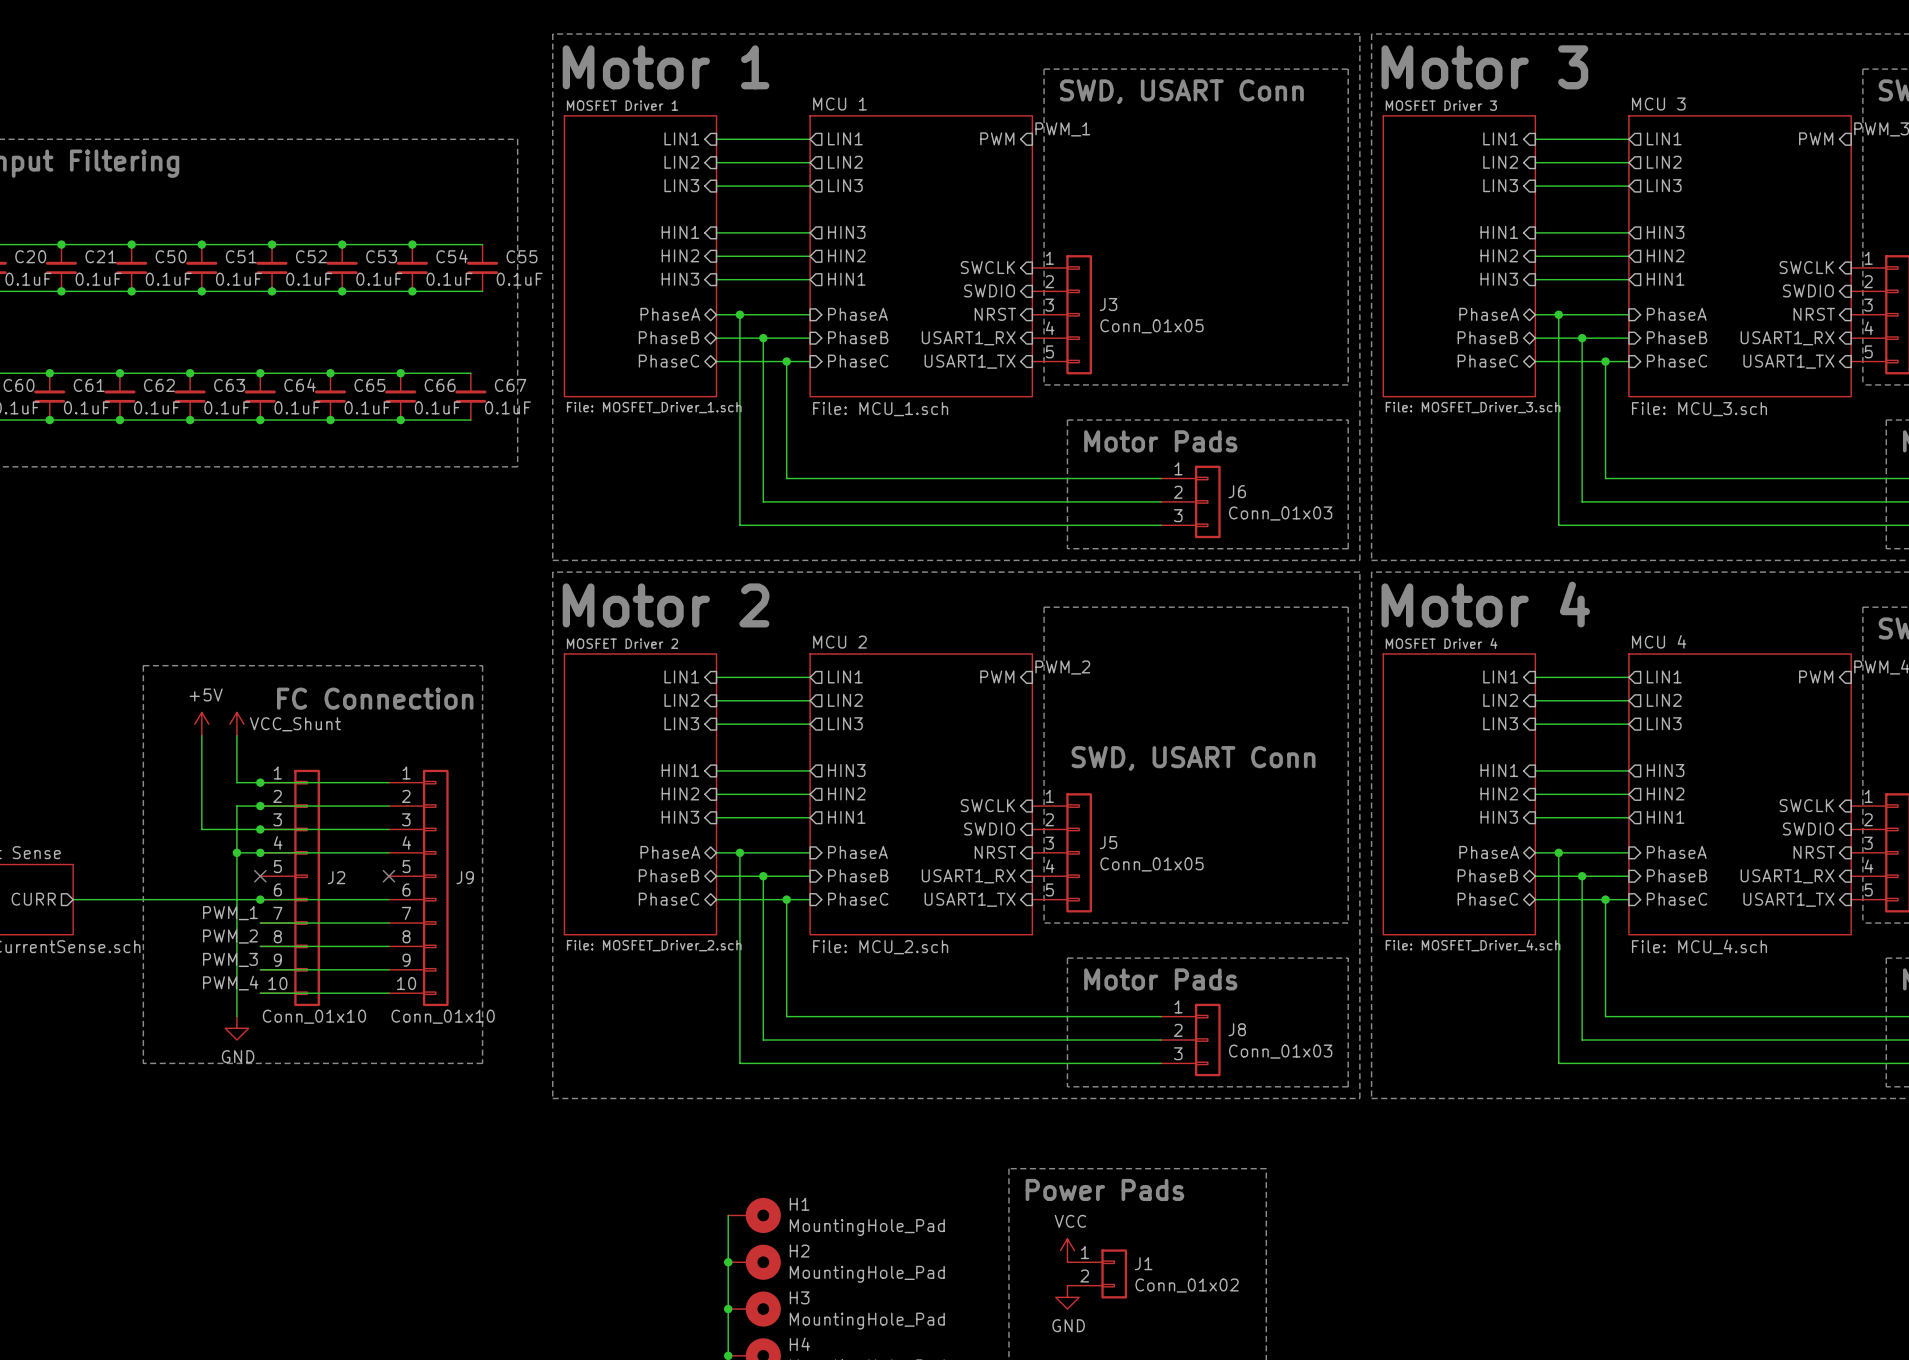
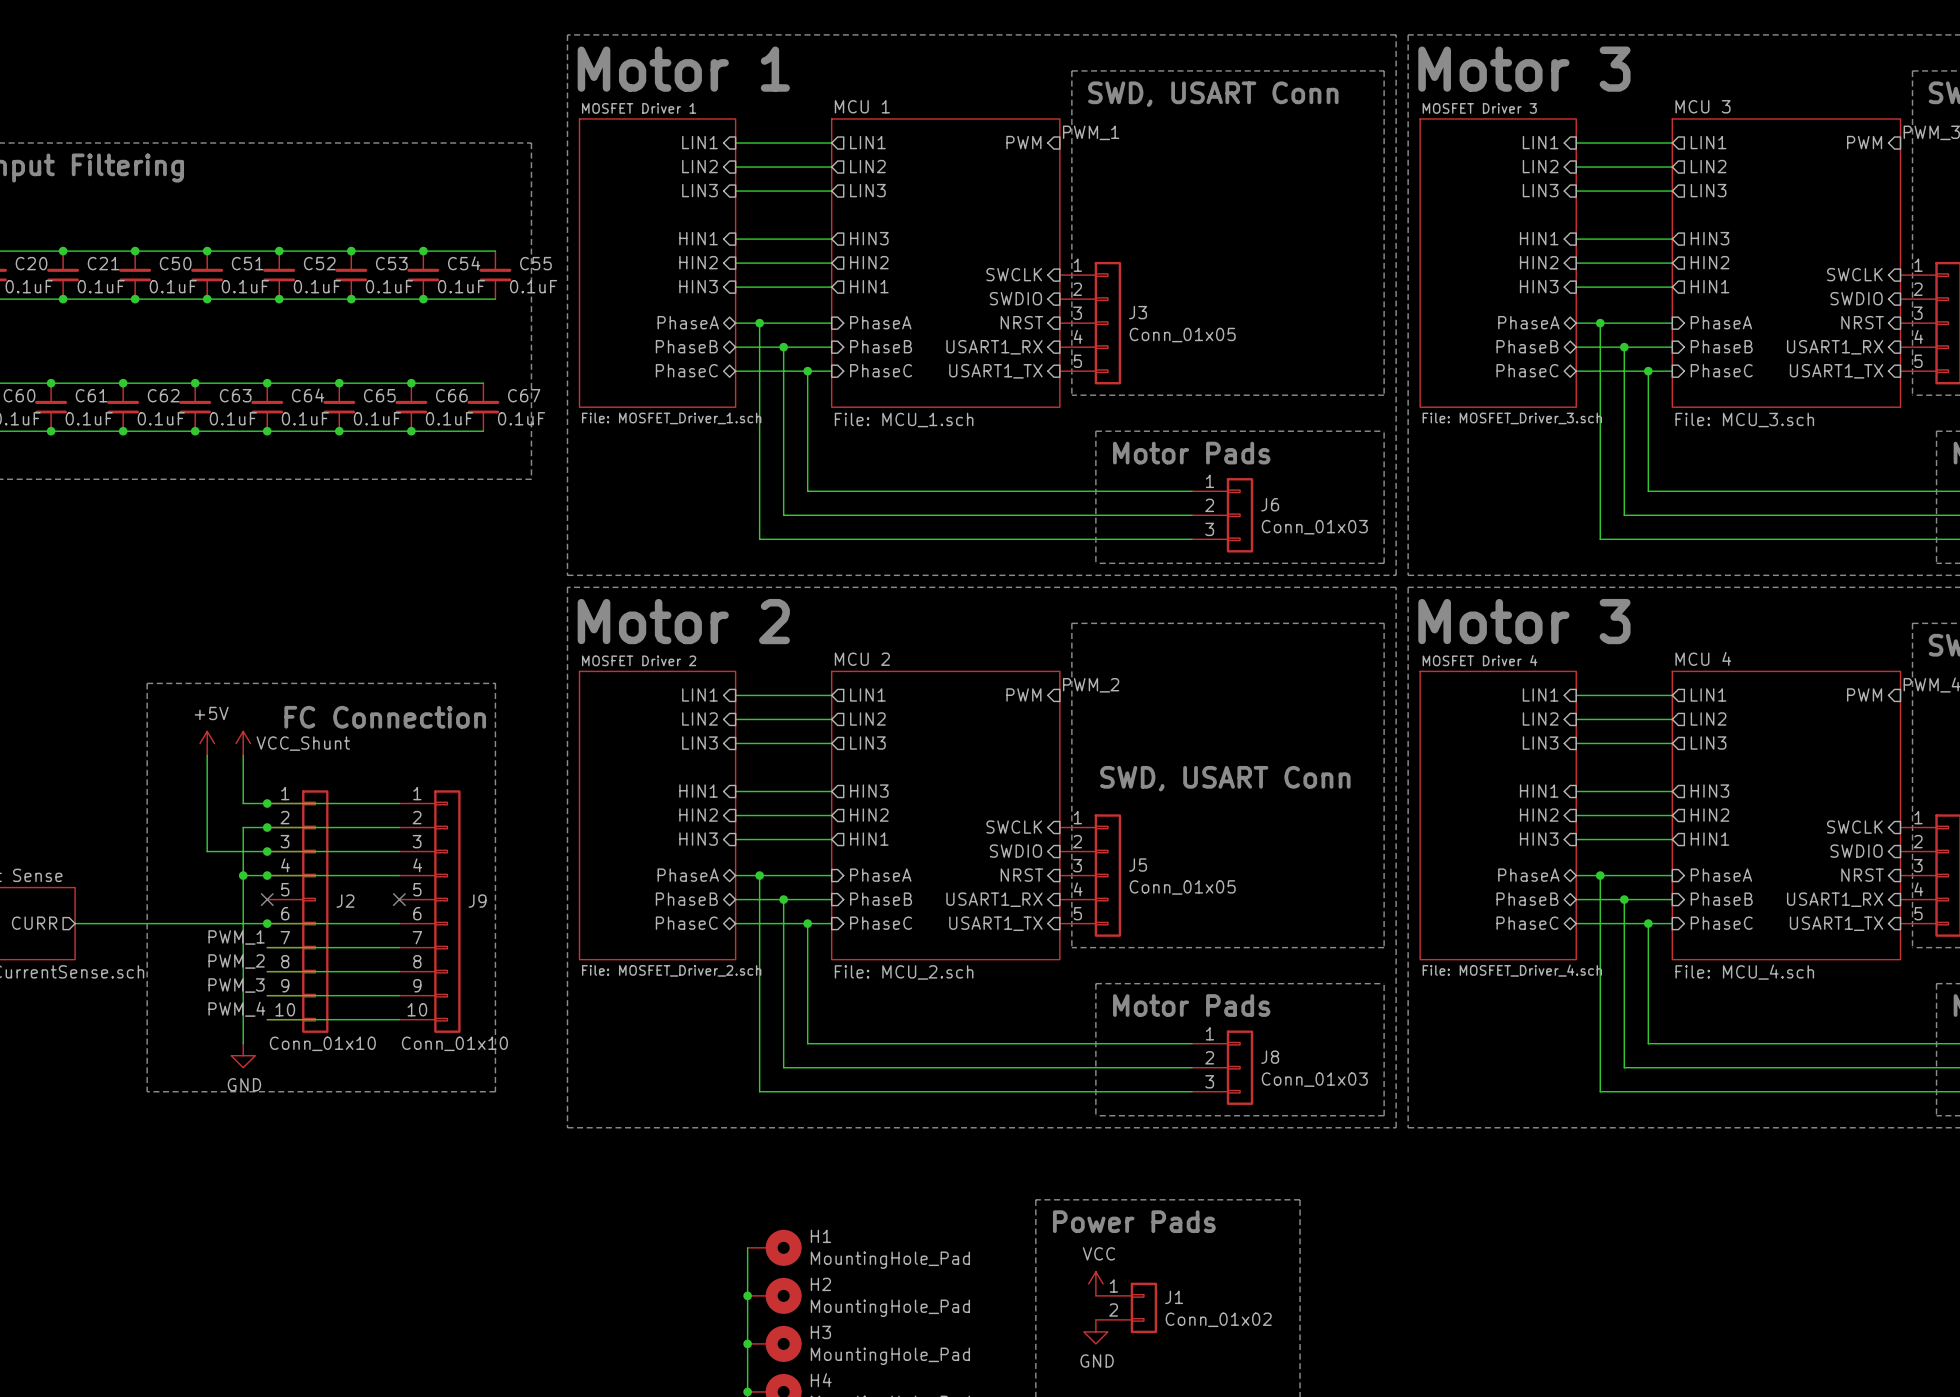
text: Motor 4 (1485, 604) -> Motor 3 (1524, 621)

